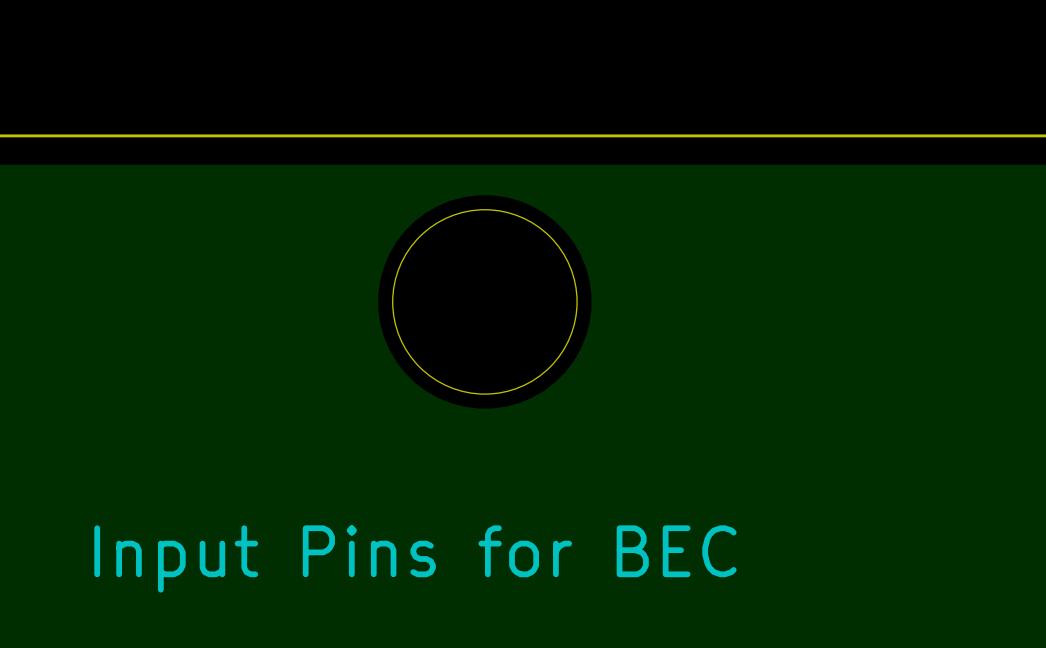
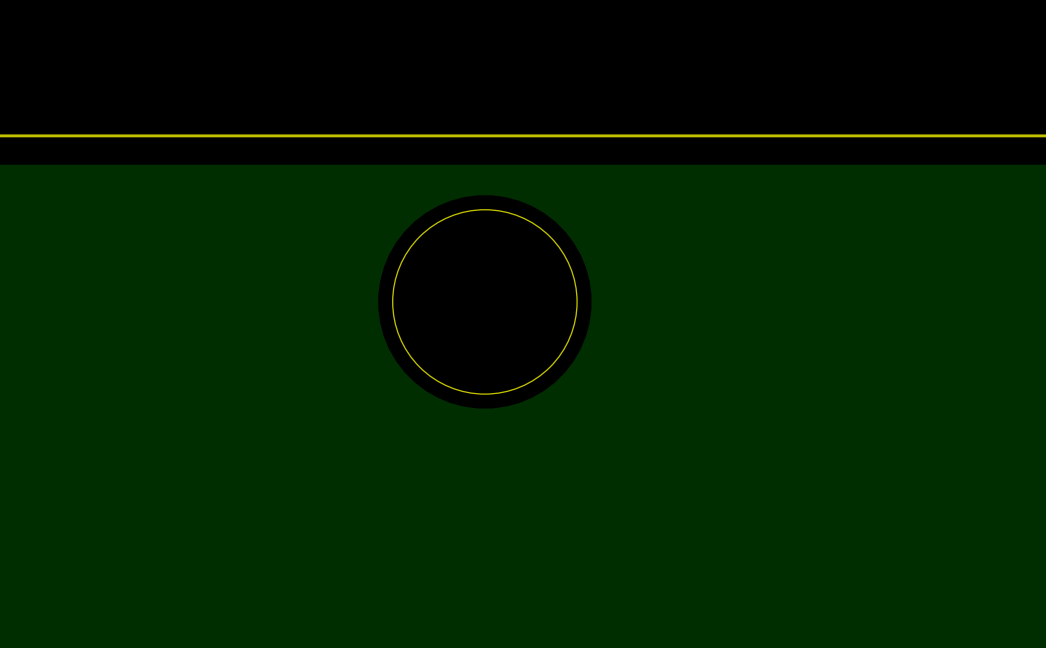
text: Input Pins for BEC (415, 558) -> none

